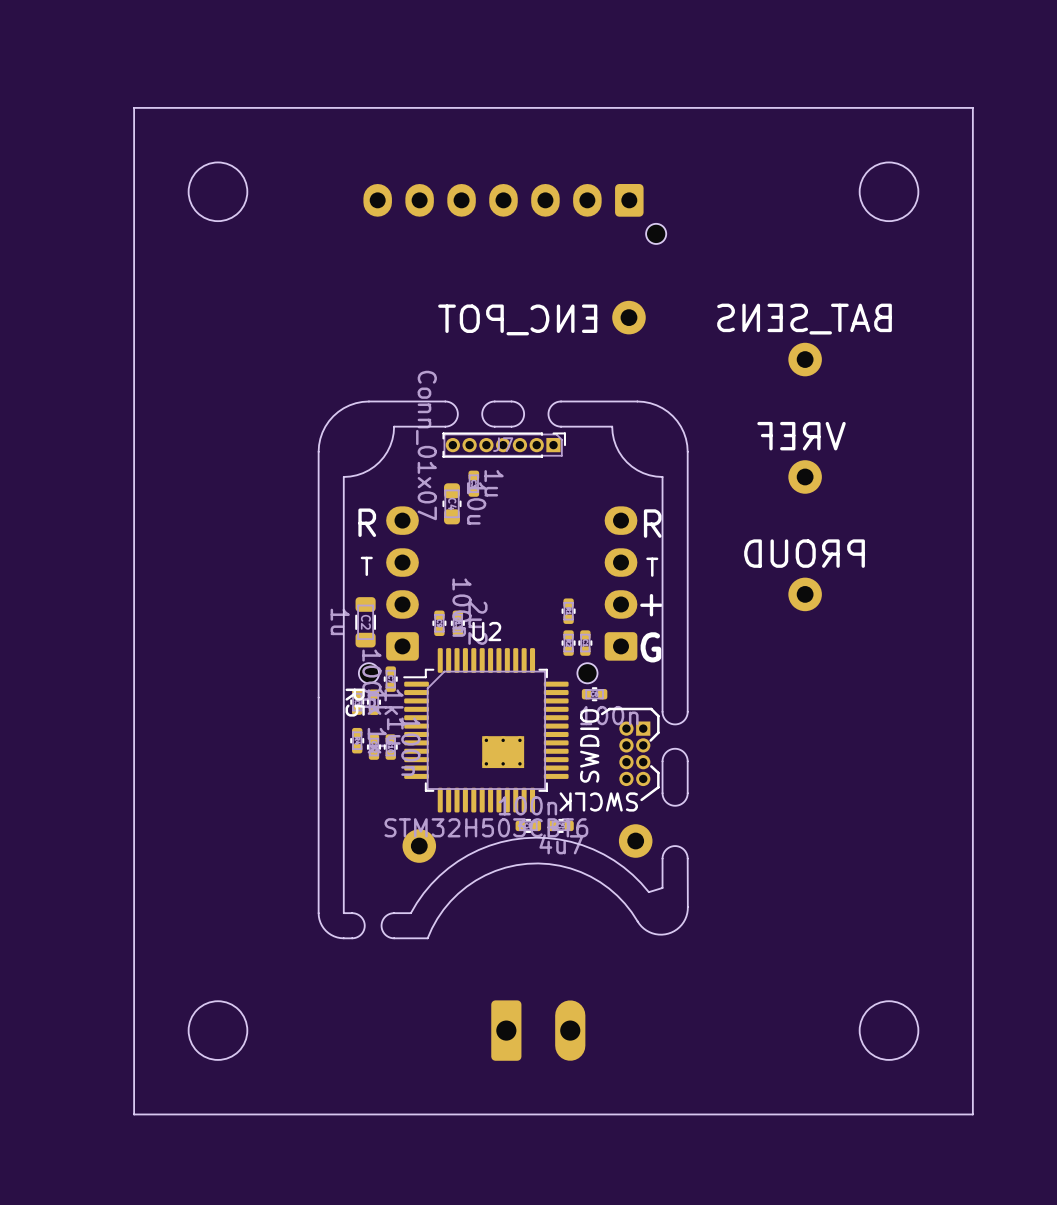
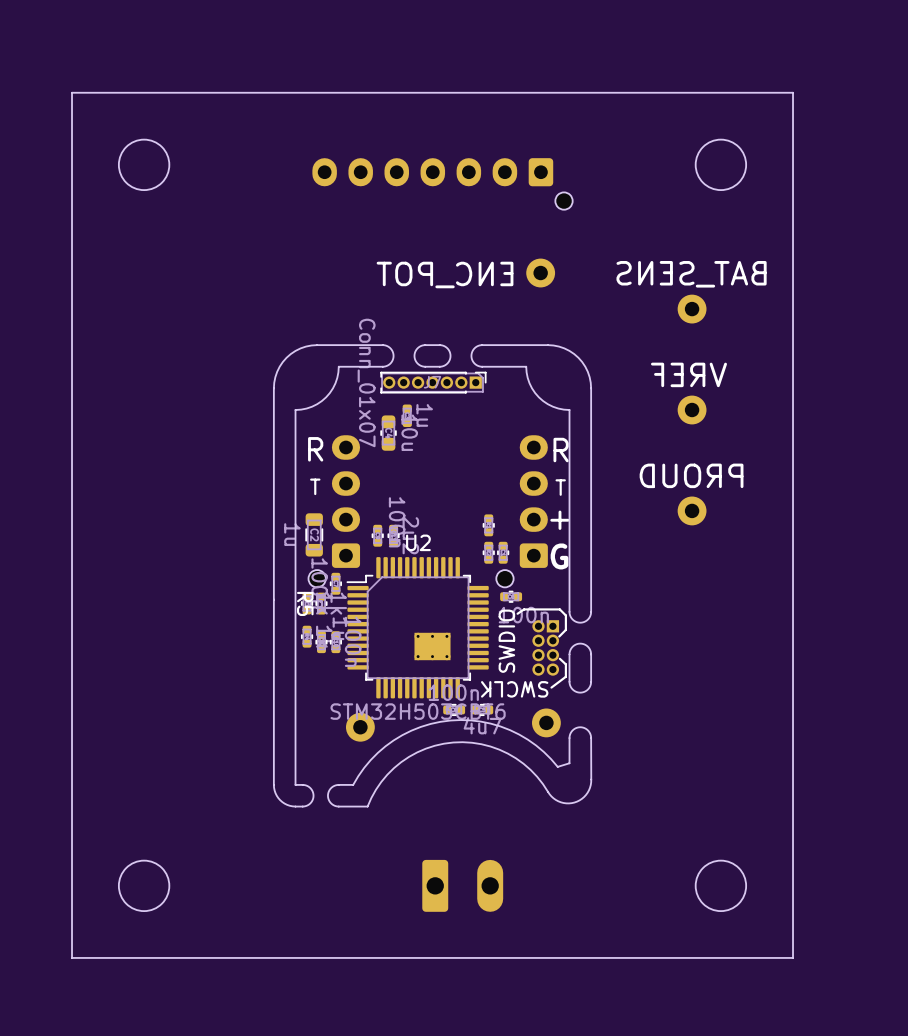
board edge: (134, 107) (134, 1114) -> (115, 92) (72, 92) (72, 957) (115, 957)
board edge: (922, 107) (972, 107) (972, 1114) (922, 1114) -> (793, 92) (793, 957)
round board edge position: (217, 191) -> (144, 164)
round board edge position: (889, 191) -> (720, 164)
round board edge position: (217, 1030) -> (144, 885)
round board edge position: (889, 1030) -> (720, 885)

